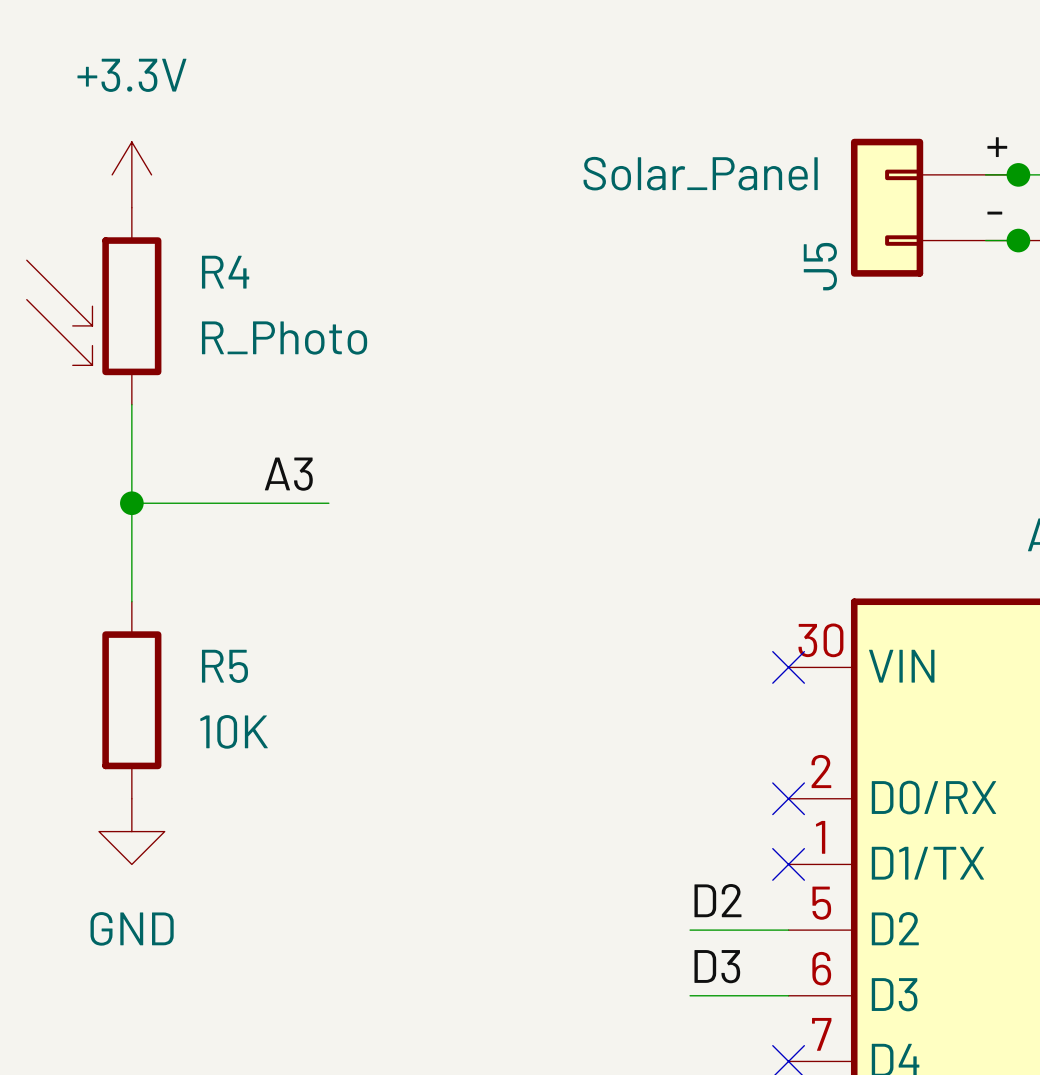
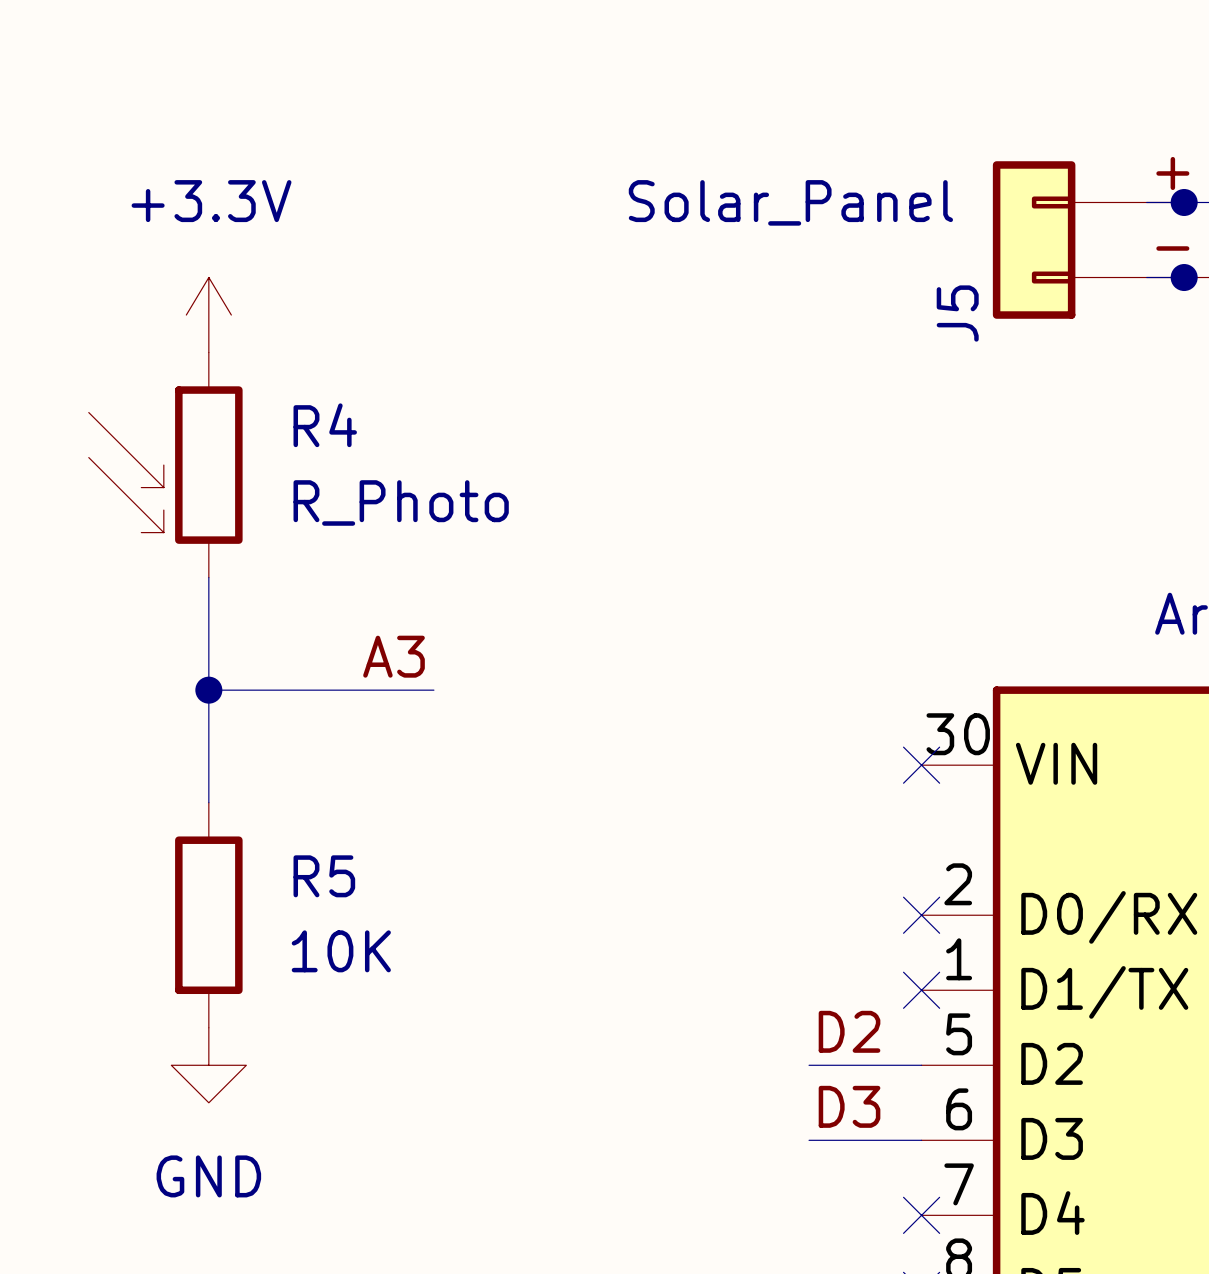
power symbol position: +3.3V (131, 174) -> +3.3V (208, 315)
R4 position: (94, 306) -> (165, 465)
wire: (131, 404) (131, 601) -> (208, 577) (208, 802)
label position: A3 (288, 474) -> A3 (394, 656)
wire: (131, 503) (328, 503) -> (208, 690) (433, 690)
junction position: (131, 503) -> (208, 690)
R5 position: (131, 700) -> (208, 915)
power symbol position: GND (131, 831) -> GND (208, 1065)

